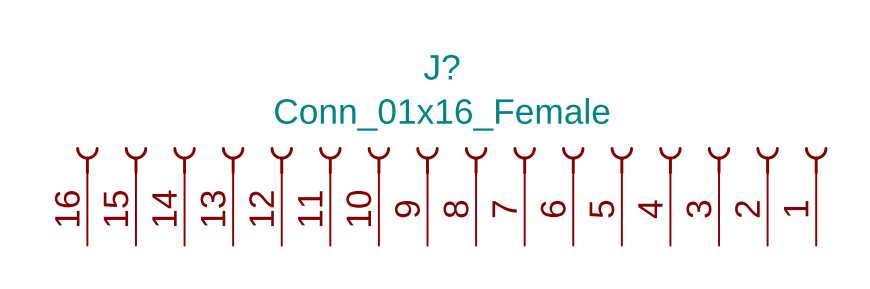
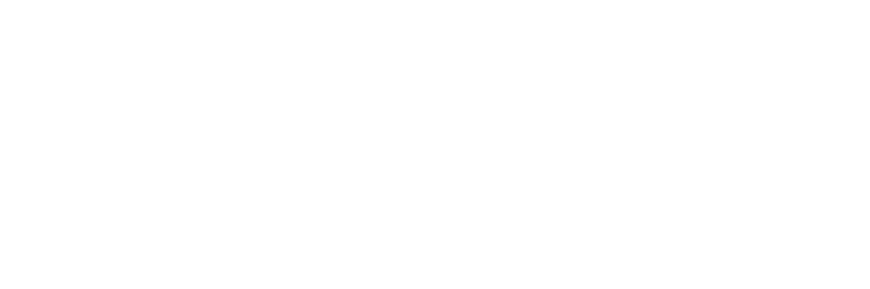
J?: Conn_01x16_Female (451, 196) -> none

